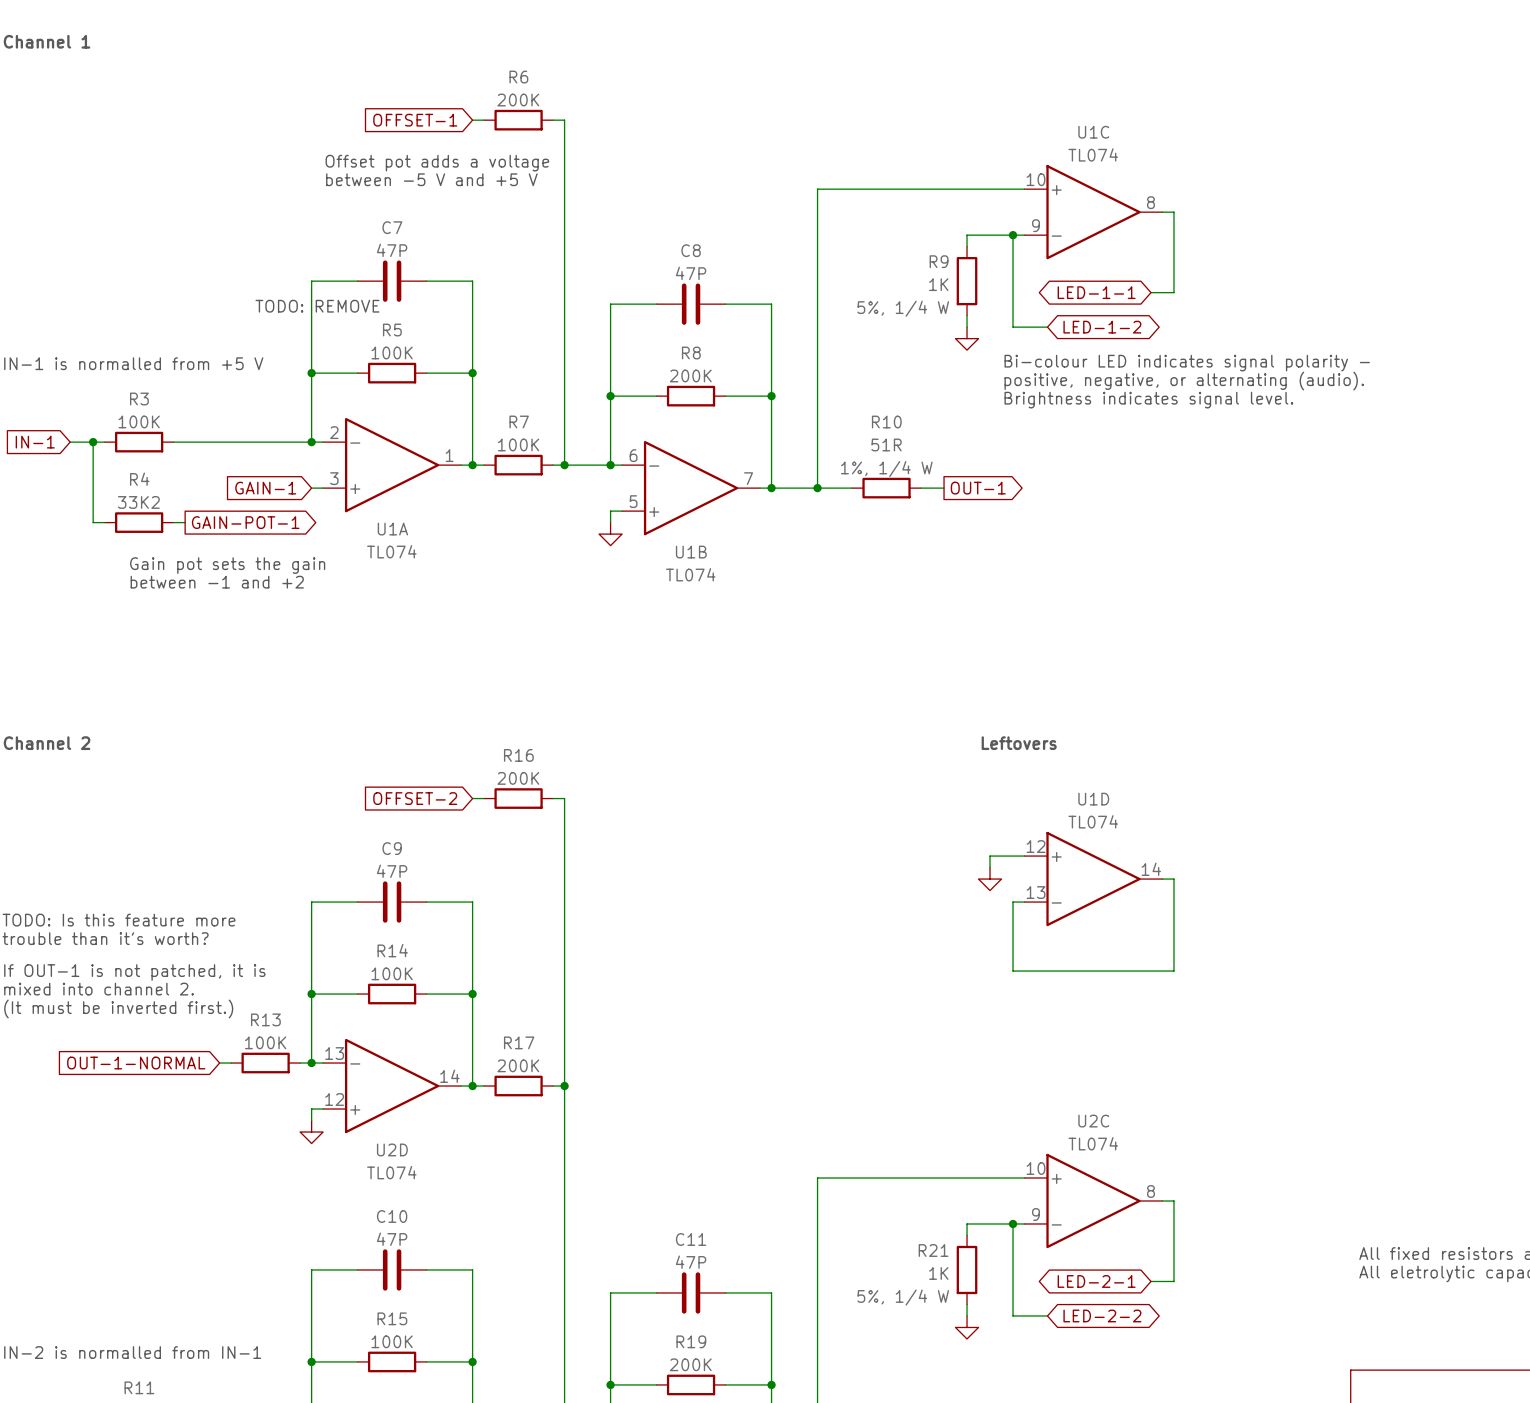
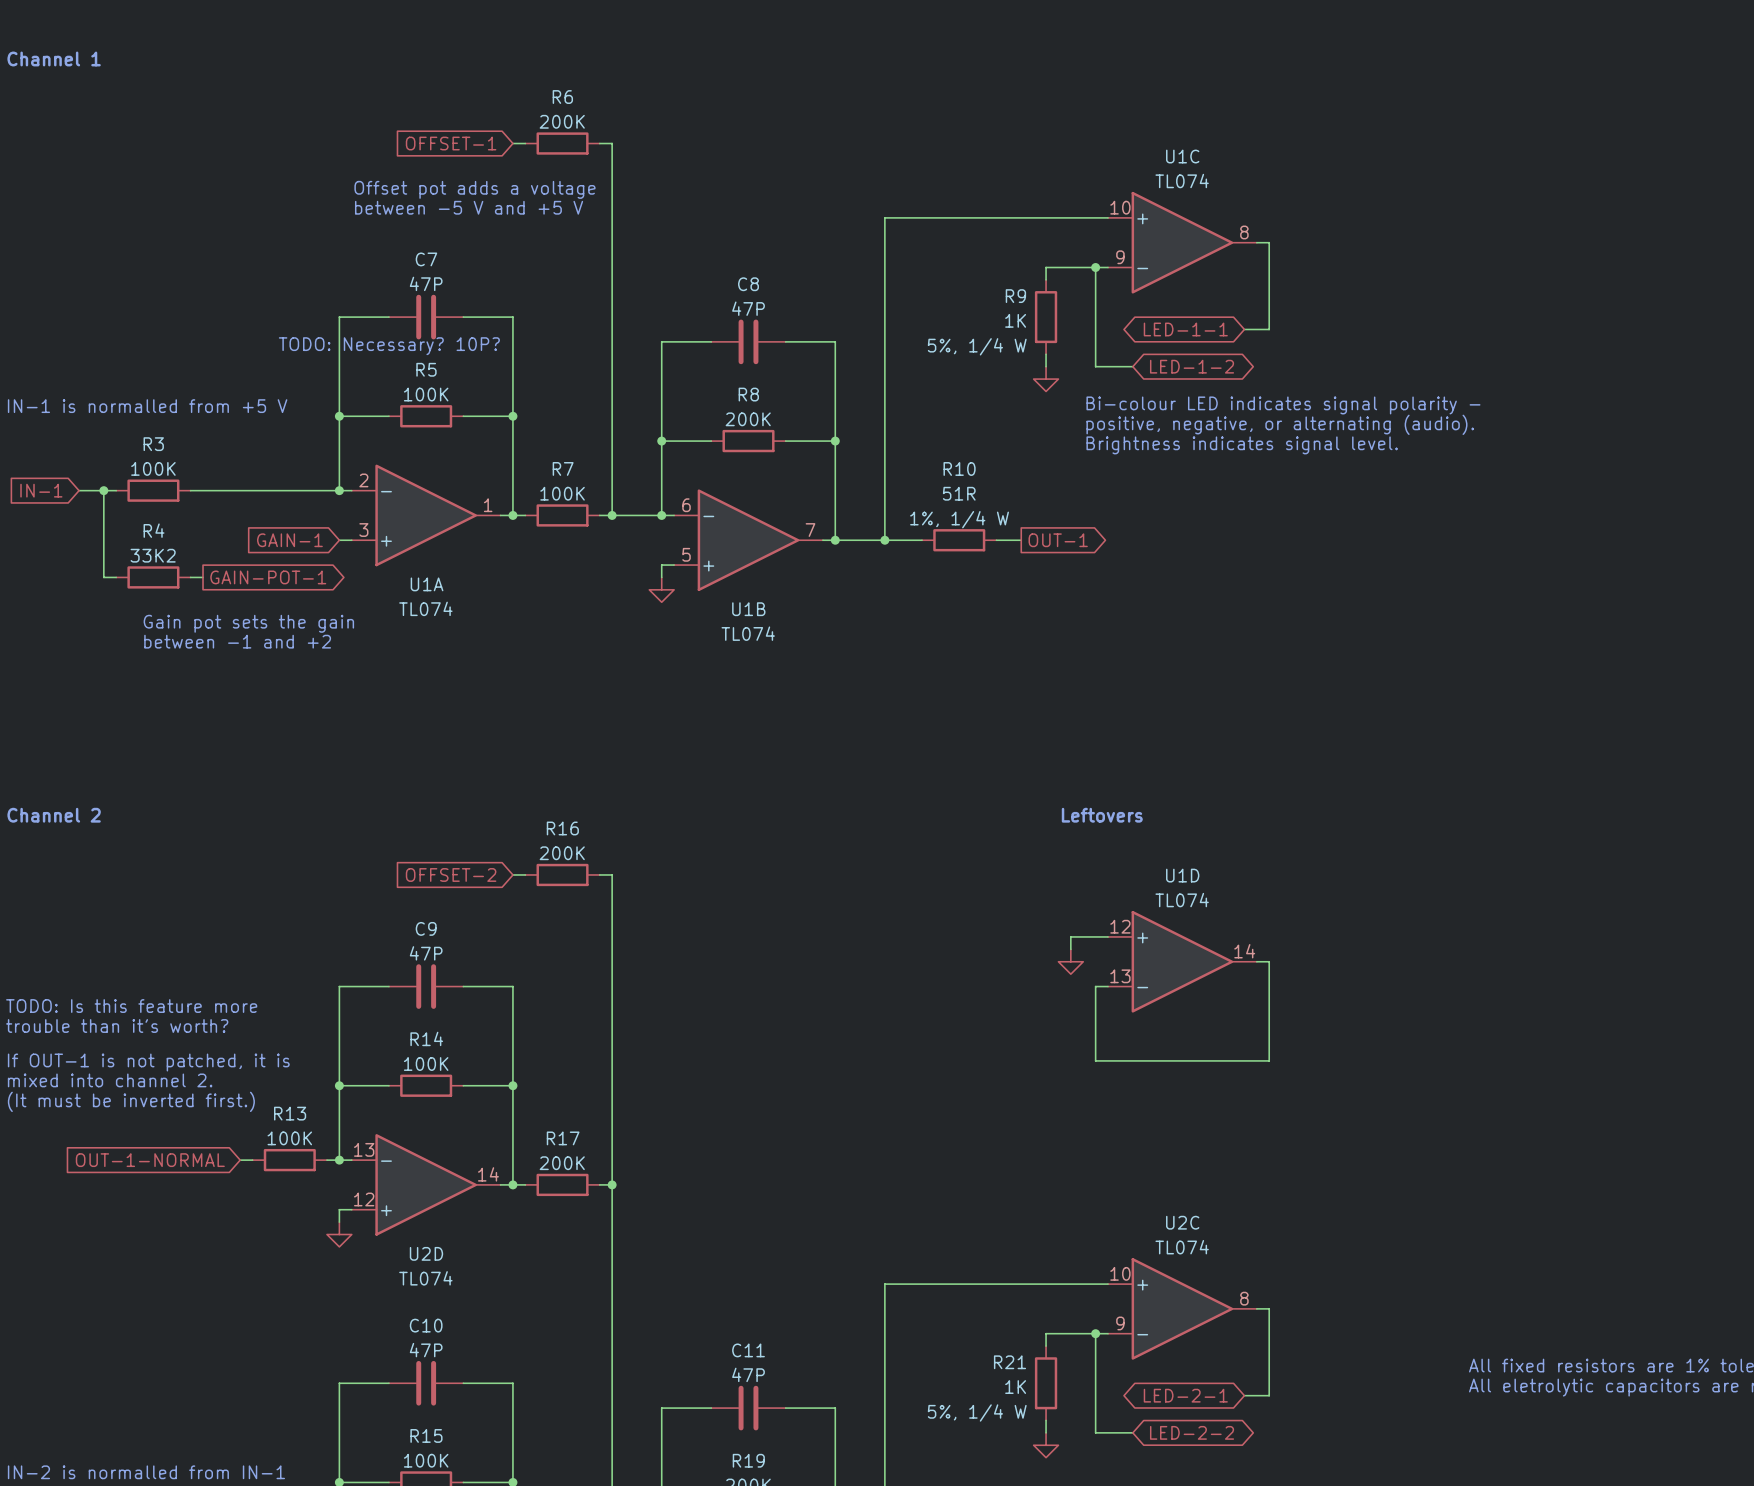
text: TODO: REMOVE (317, 306) -> TODO: Necessary? 10P? (389, 346)

